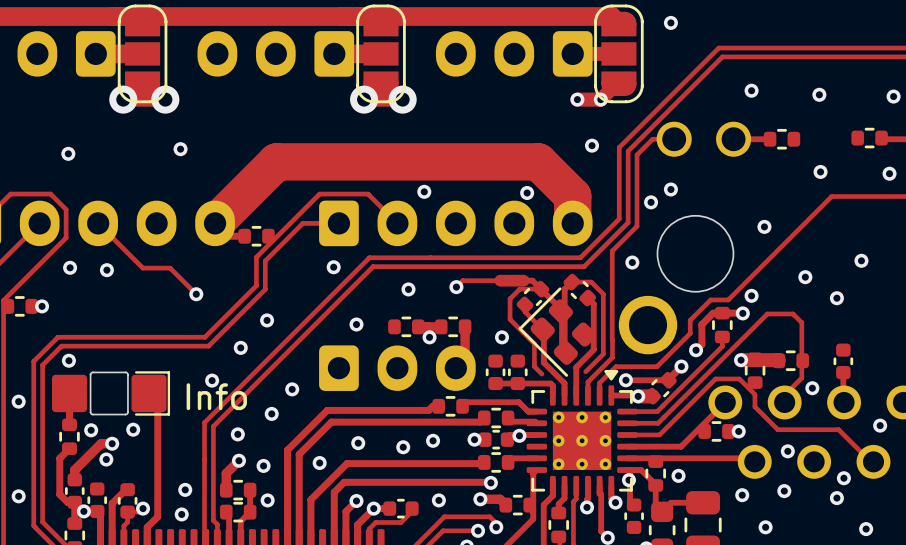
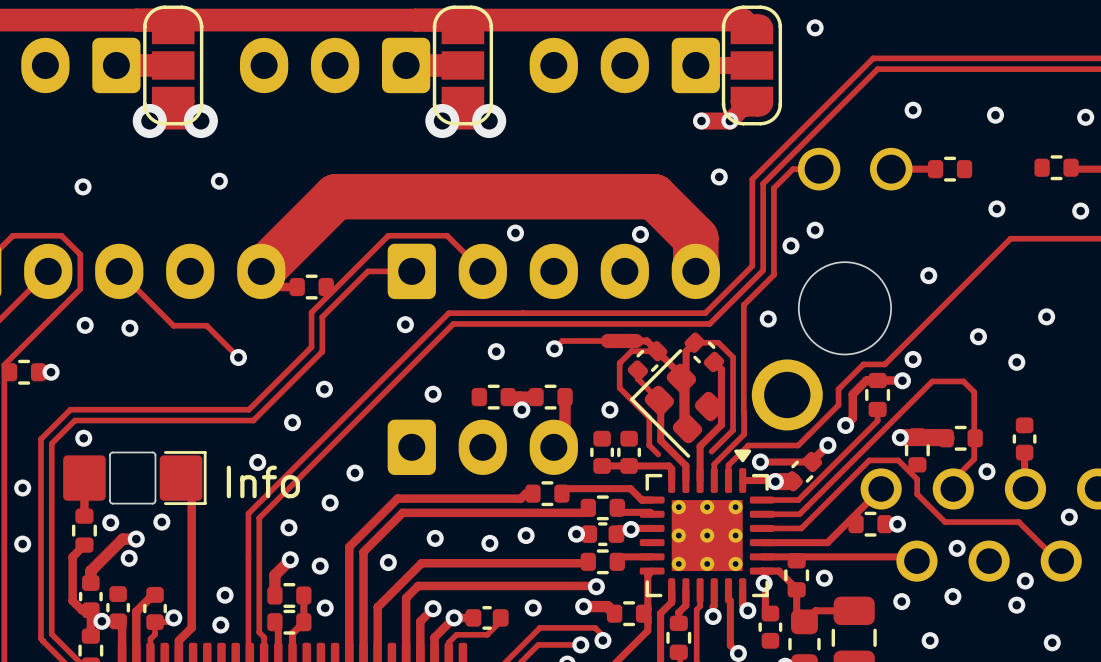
via: none -> (22, 544)
via: (18, 496) -> none

